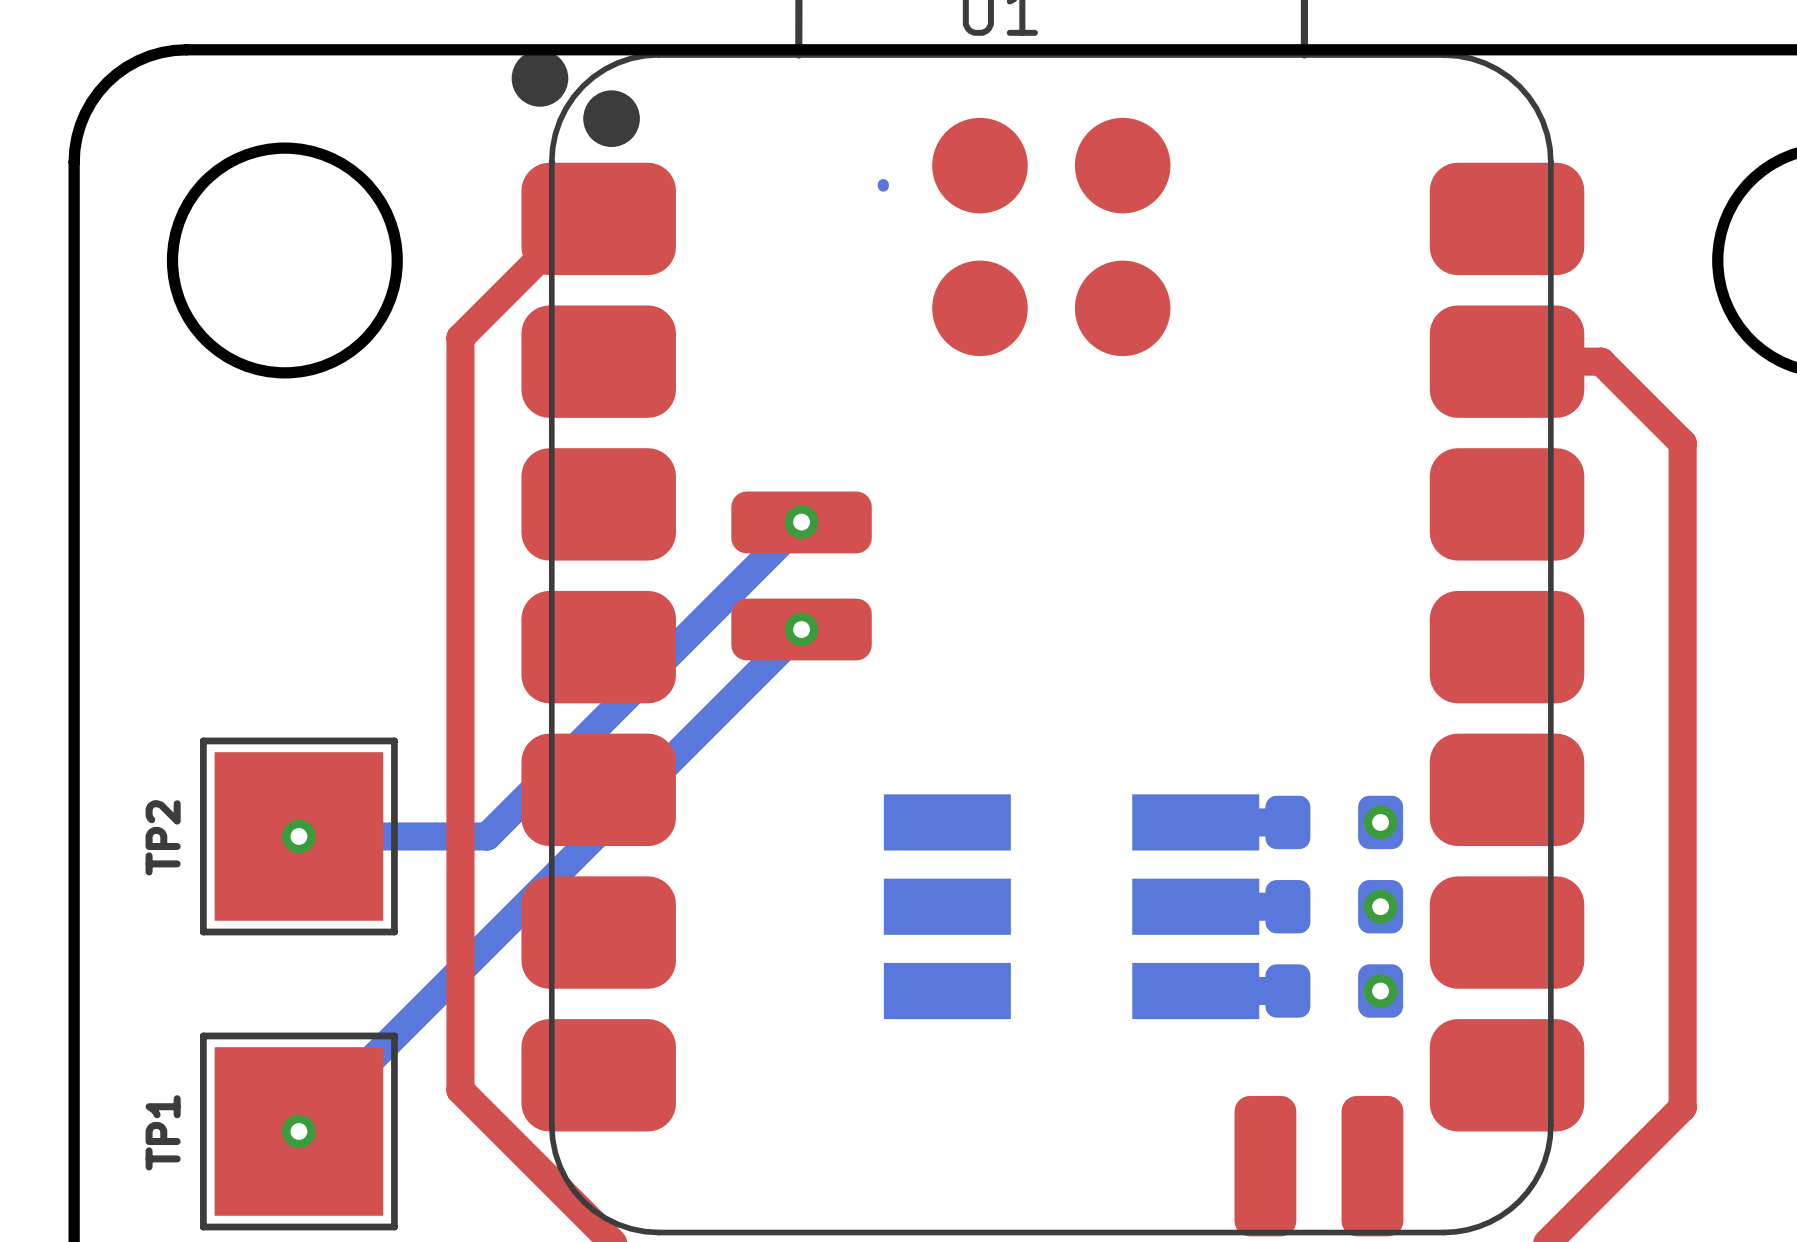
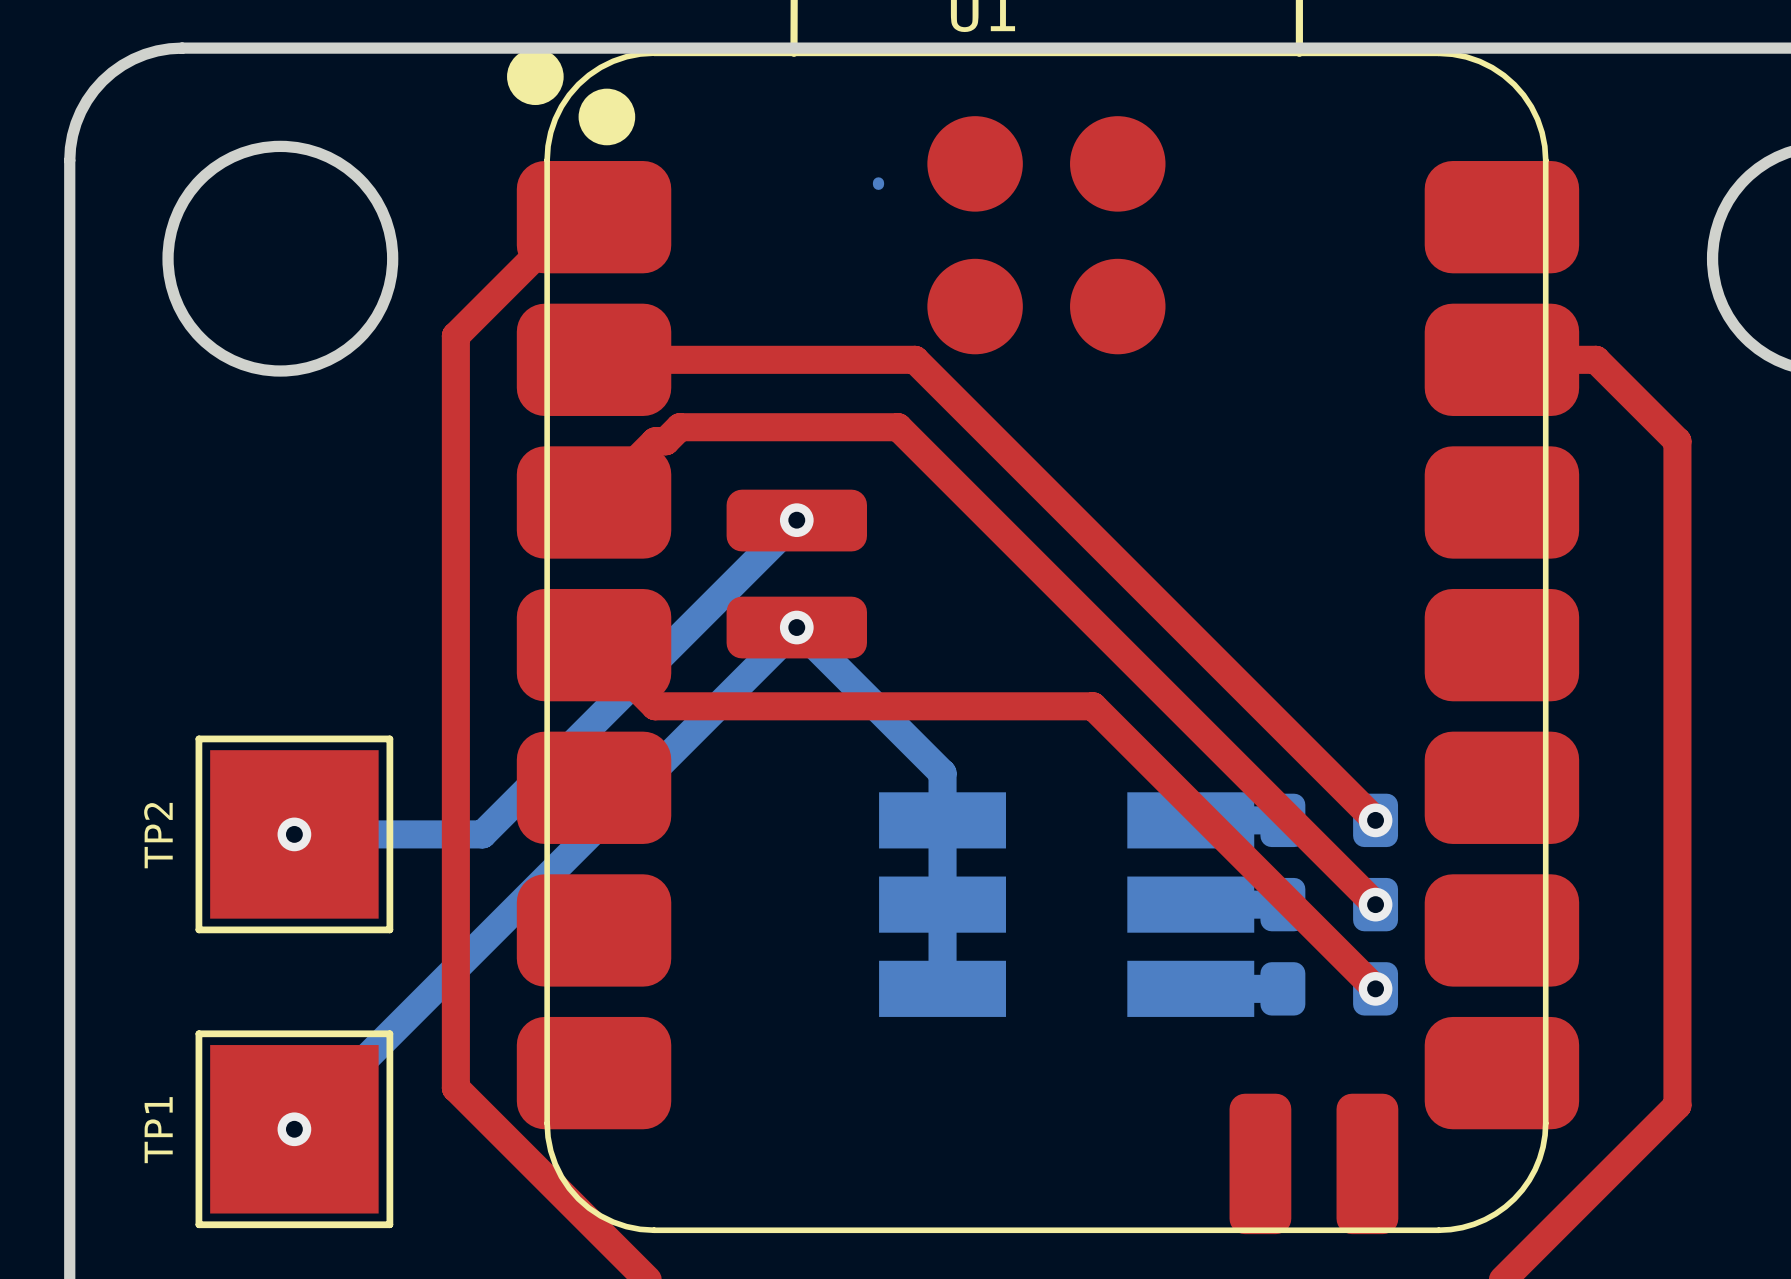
top track: none -> (594, 359) (915, 359) (1375, 820)
top track: none -> (594, 502) (655, 441) (665, 441) (679, 427) (898, 427) (1375, 904)
bottom track: none -> (796, 627) (942, 773) (942, 988)
top track: none -> (594, 645) (655, 706) (1093, 706) (1375, 988)

